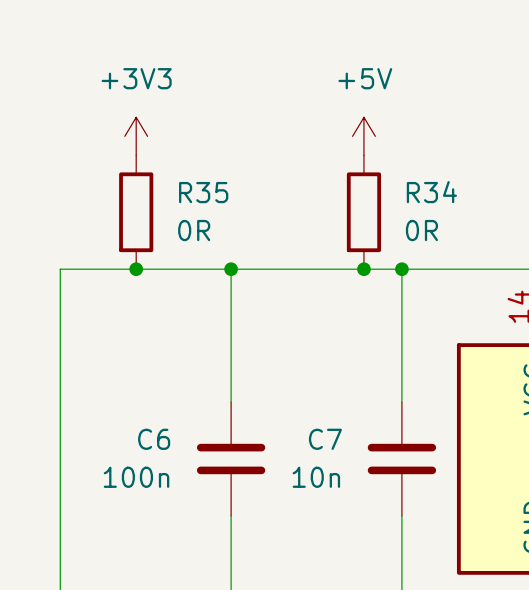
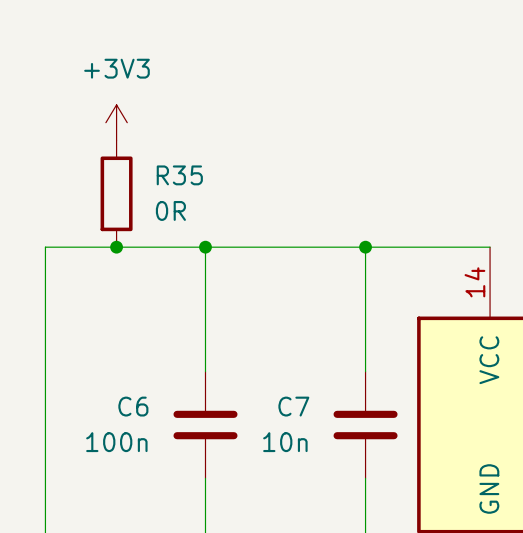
power symbol: +5V (363, 136) -> none
R34: 0R (363, 212) -> none
junction: (363, 269) -> none

